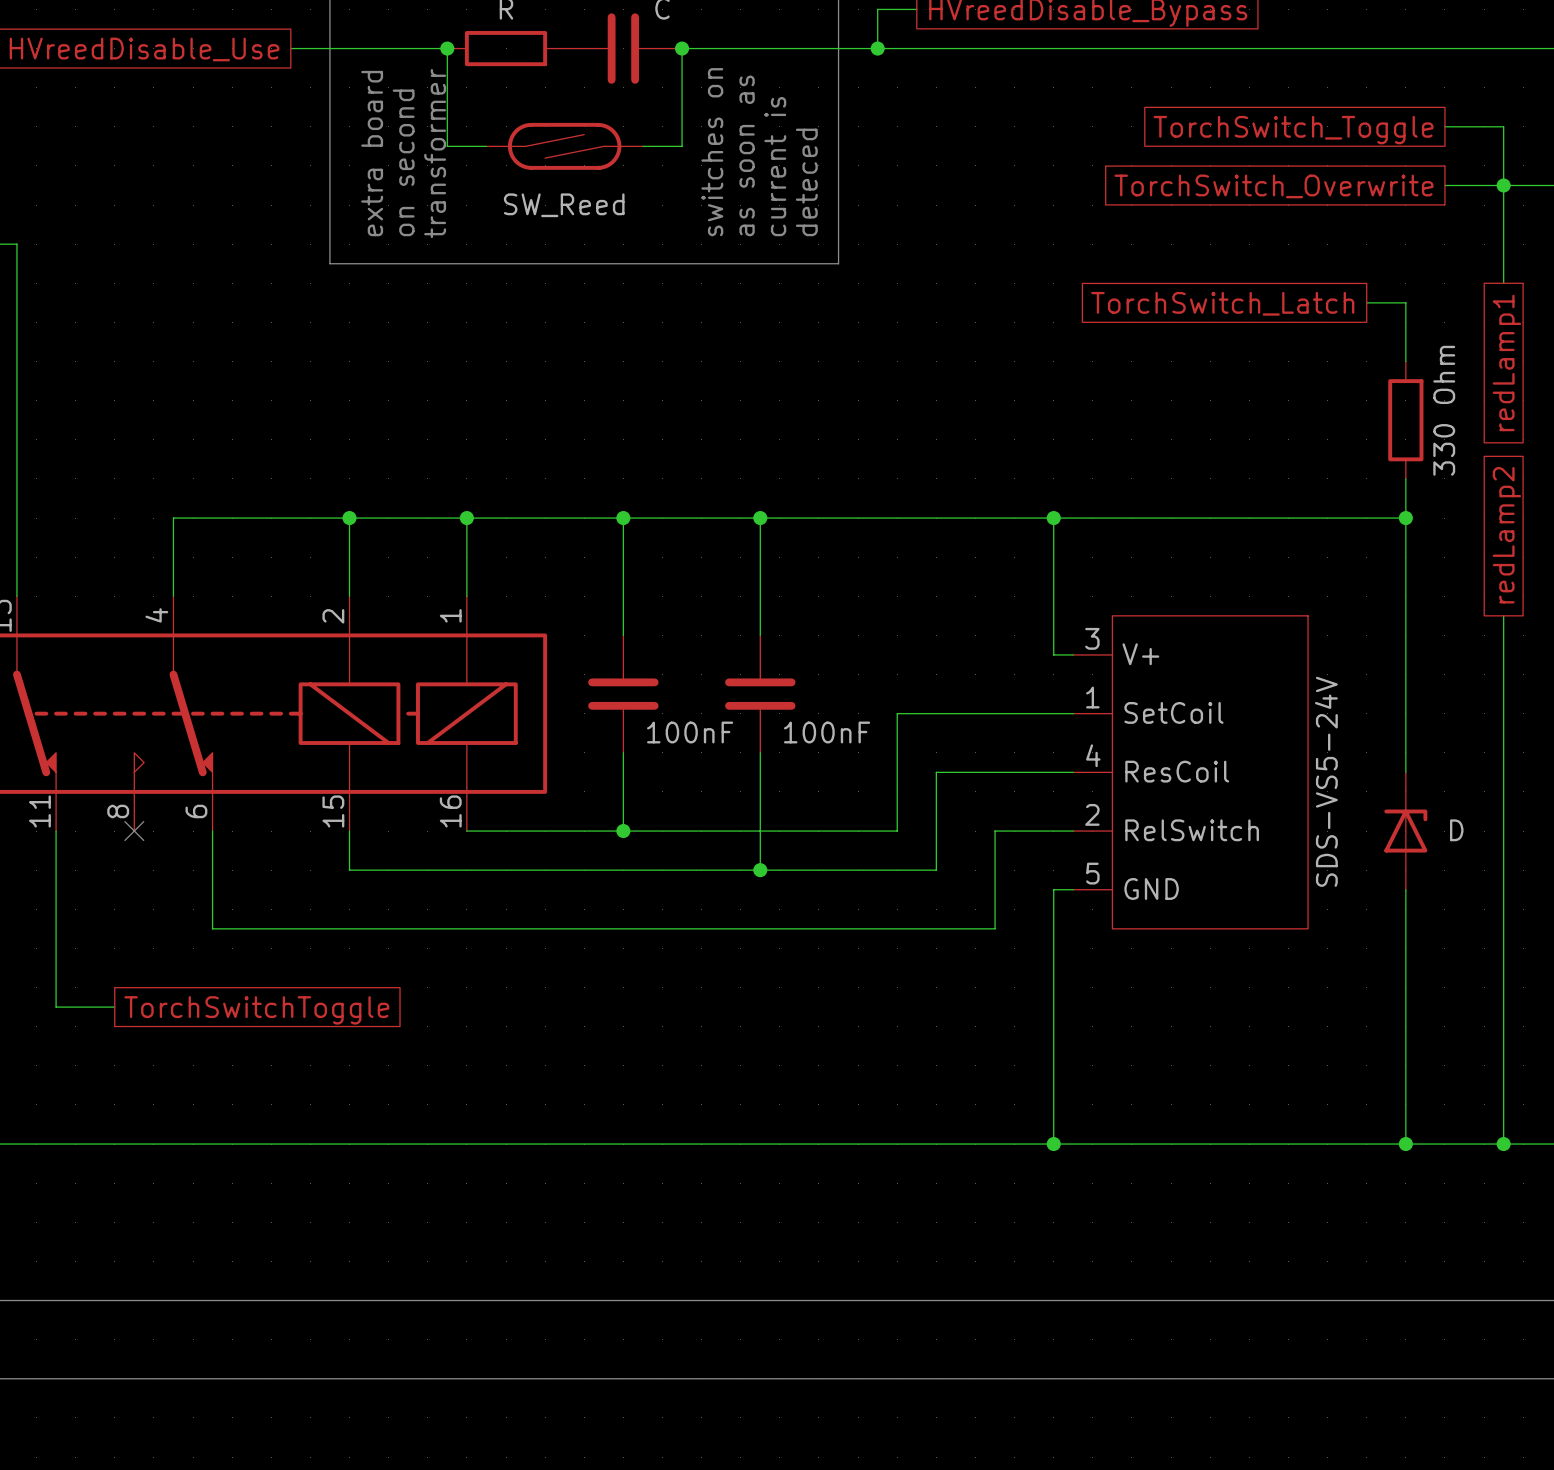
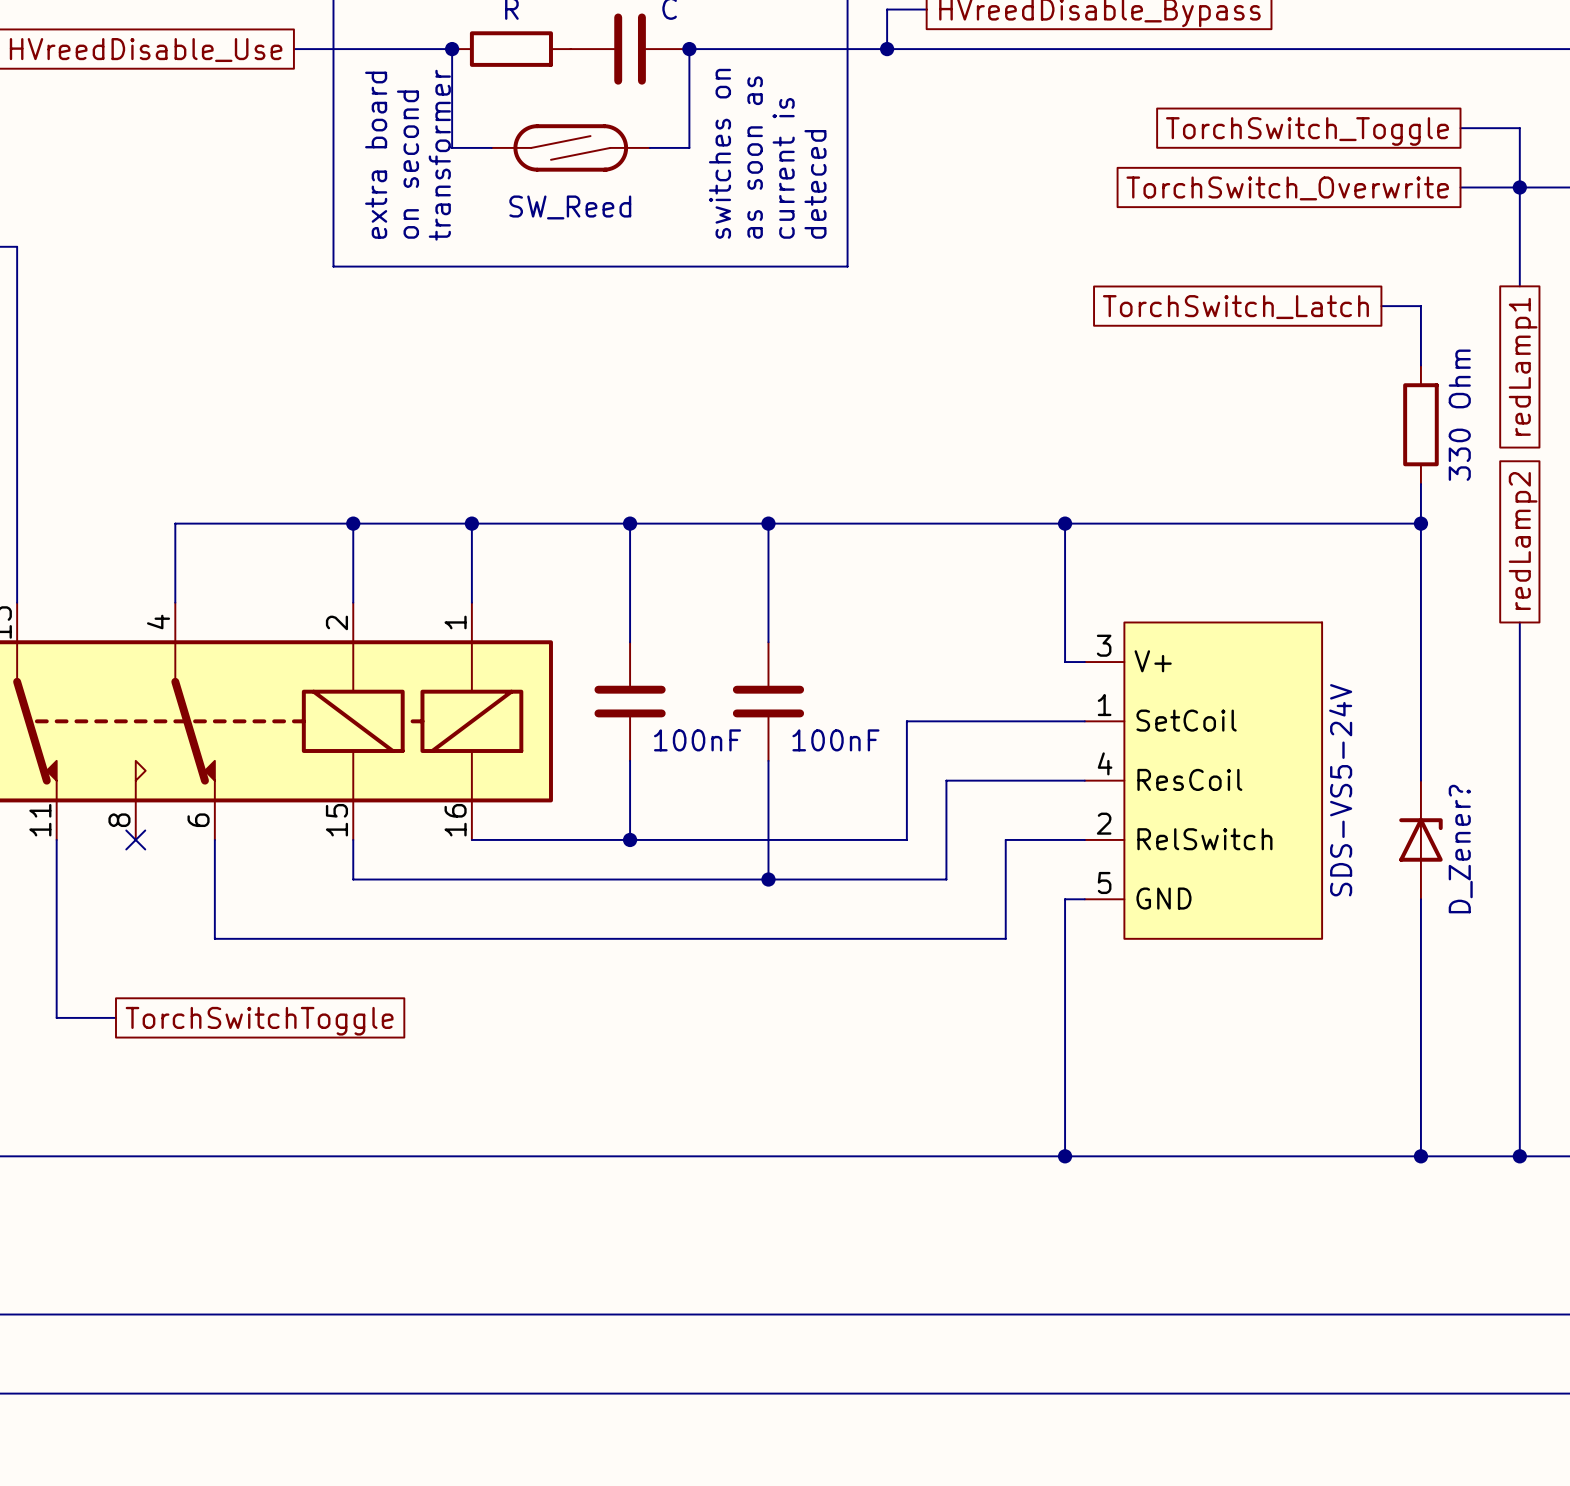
D name: D (1456, 830) -> none
D value: none -> D_Zener? (1460, 849)

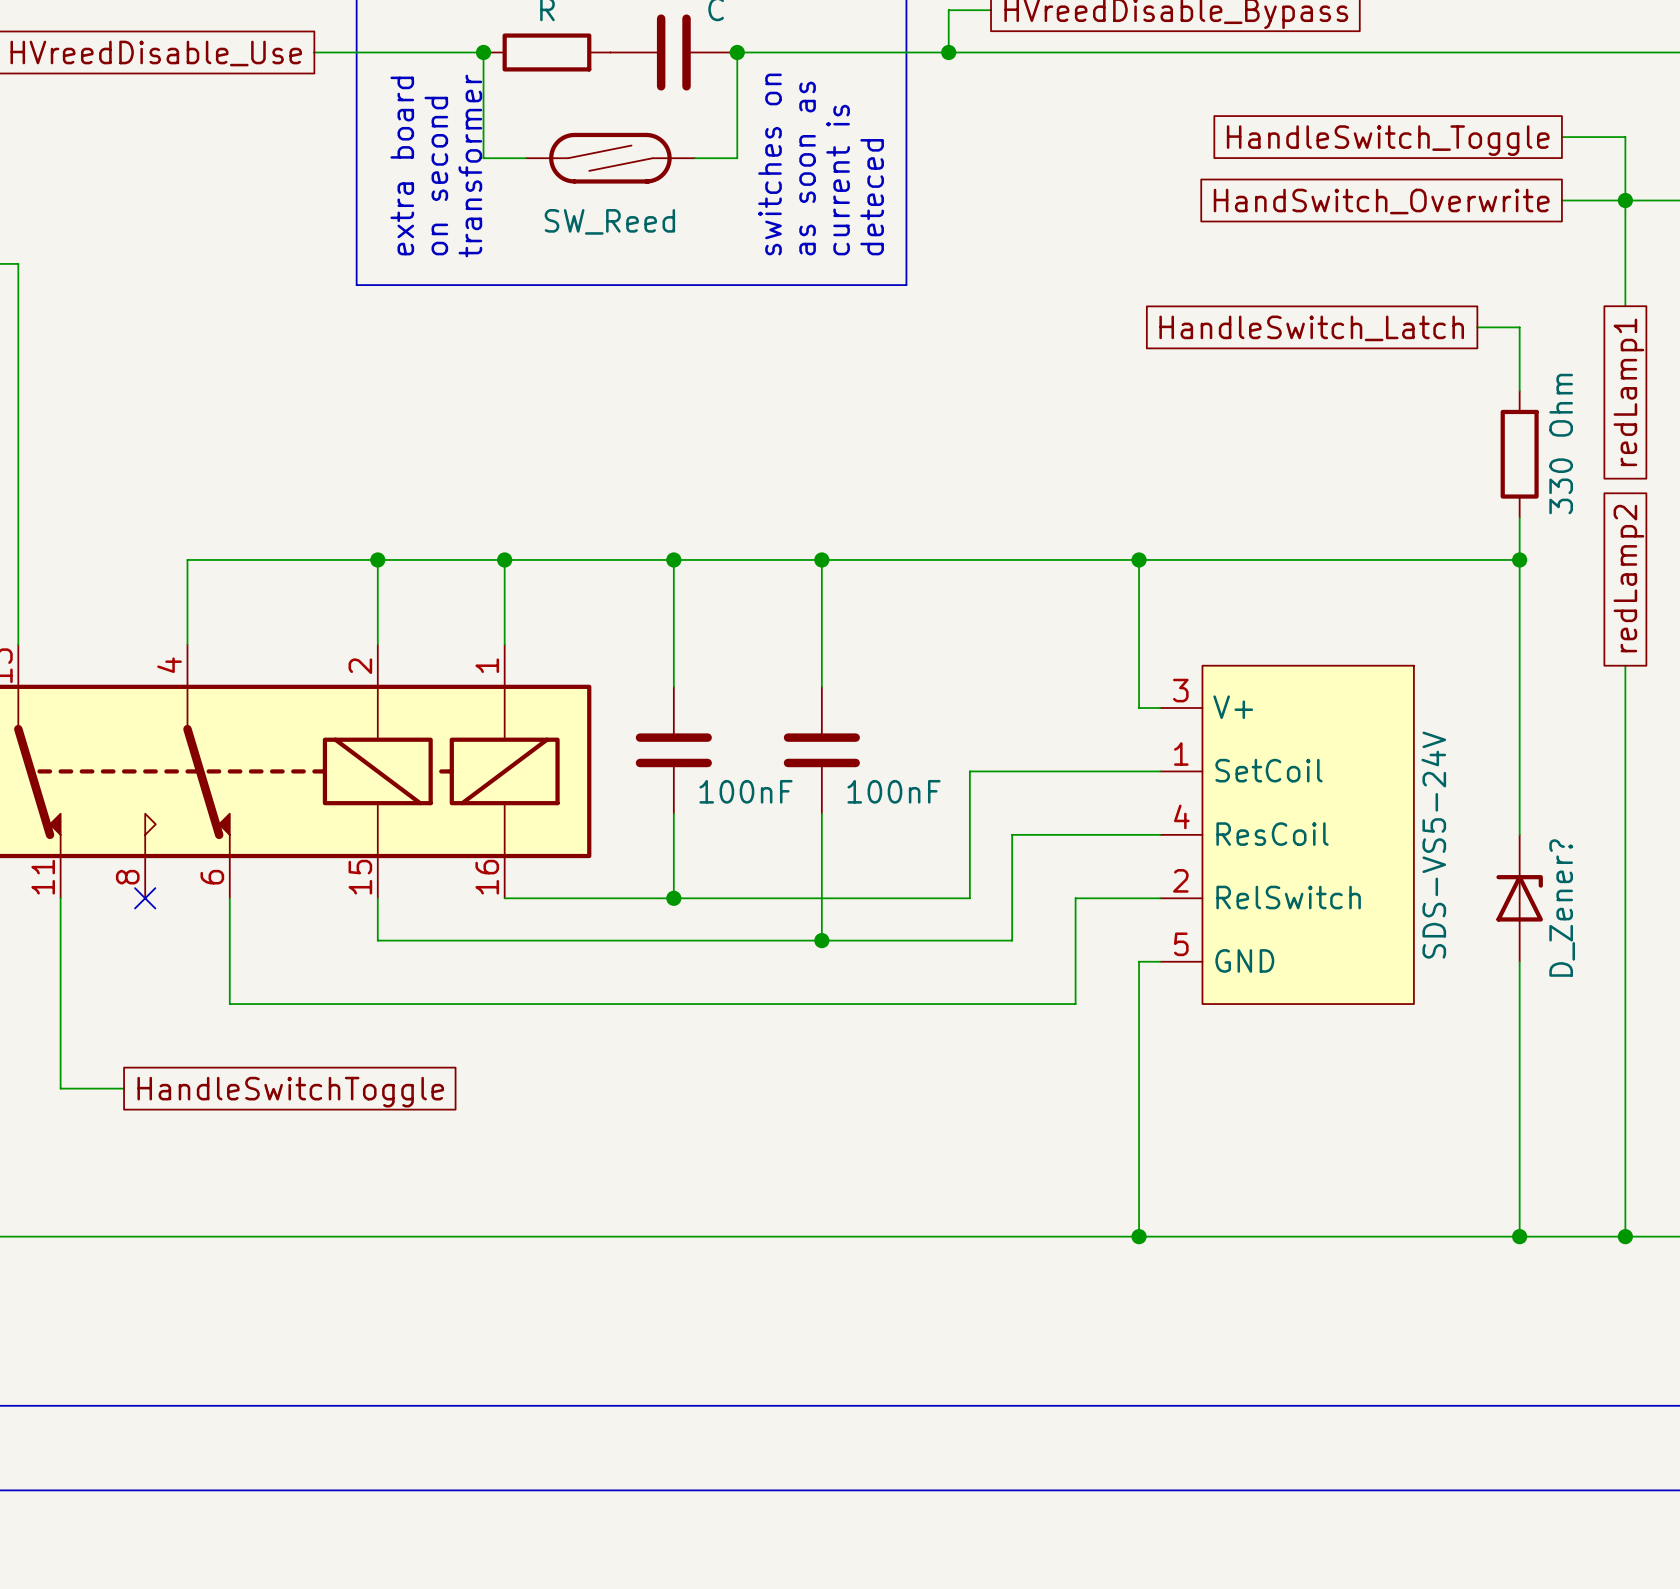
global label: TorchSwitch_Toggle (1307, 131) -> HandleSwitch_Toggle (1388, 140)
global label: TorchSwitch_Overwrite (1287, 188) -> HandSwitch_Overwrite (1381, 201)
global label: TorchSwitch_Latch (1235, 307) -> HandleSwitch_Latch (1311, 328)
global label: TorchSwitchToggle (259, 1021) -> HandleSwitchToggle (290, 1092)

